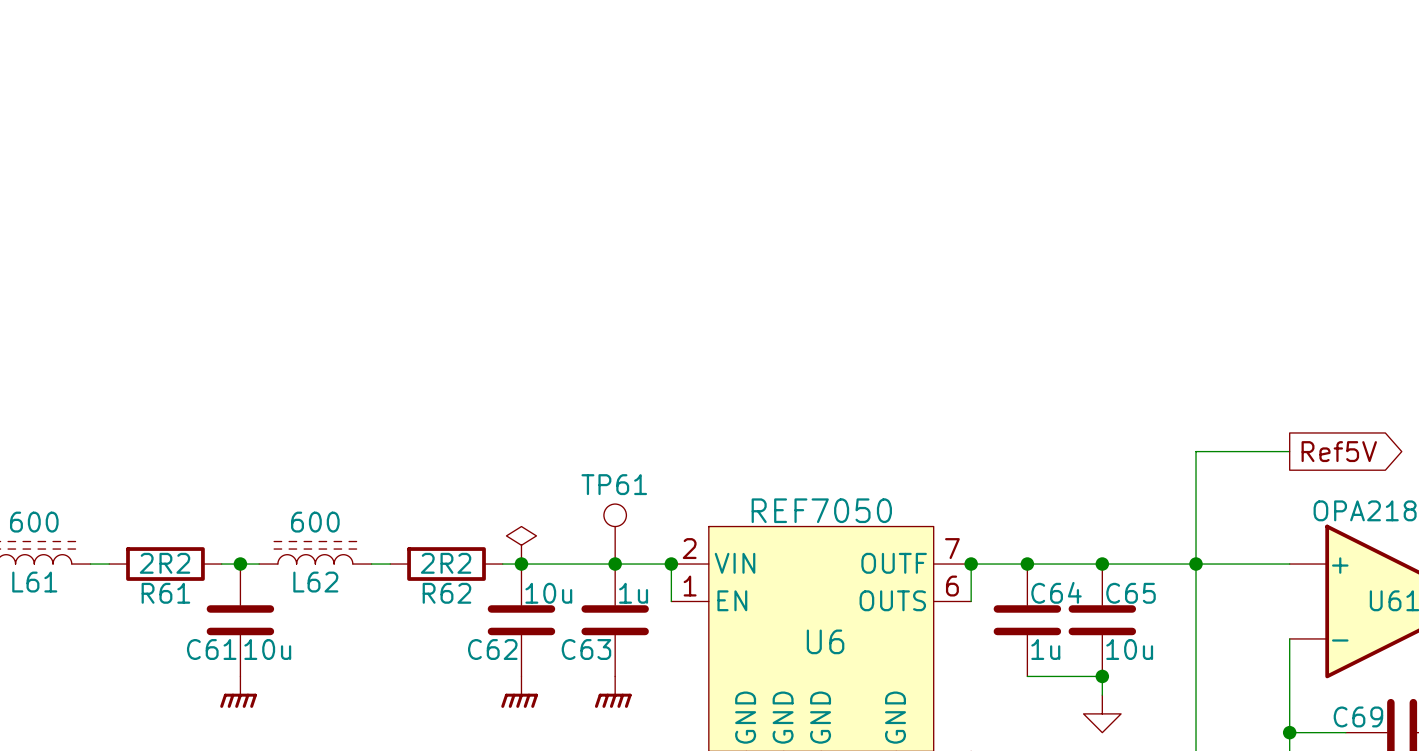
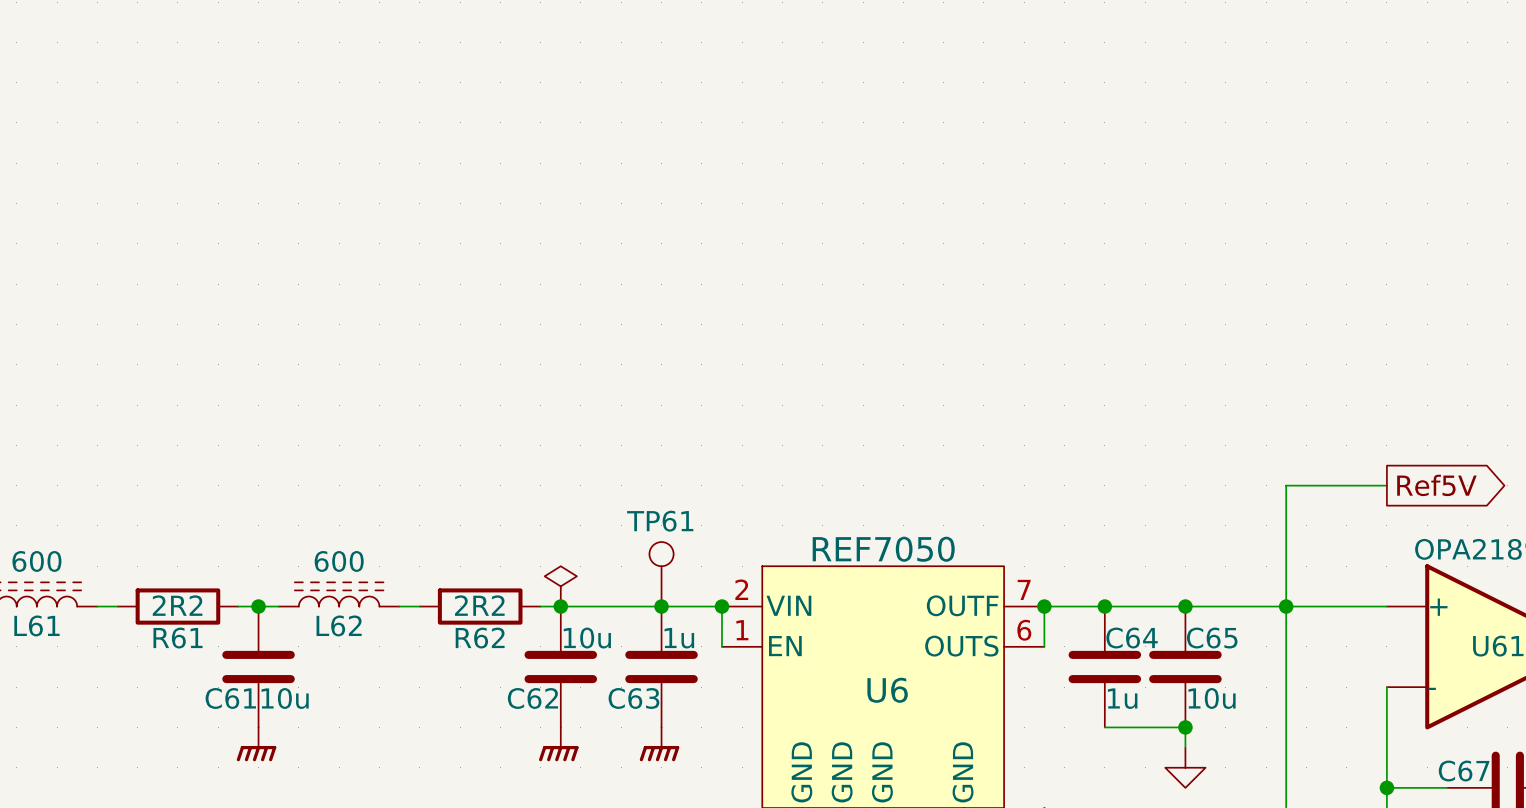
C69 name: C69 (1358, 716) -> C67 (1464, 771)

